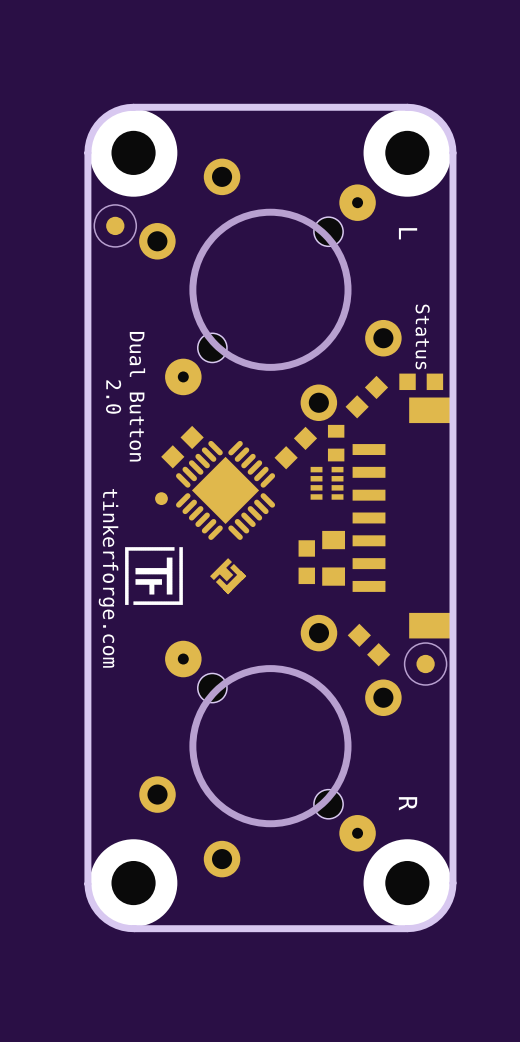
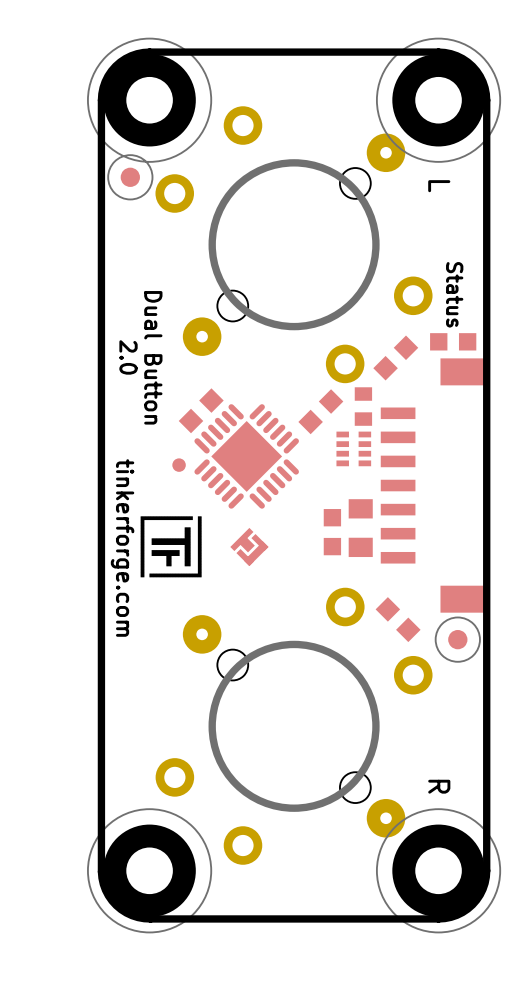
part footprint: [89, 109, 178, 197] -> [87, 38, 212, 162]
part footprint: [363, 109, 452, 197] -> [376, 38, 501, 162]
part footprint: [89, 839, 178, 927] -> [87, 809, 212, 933]
part footprint: [363, 839, 452, 927] -> [376, 809, 501, 933]

